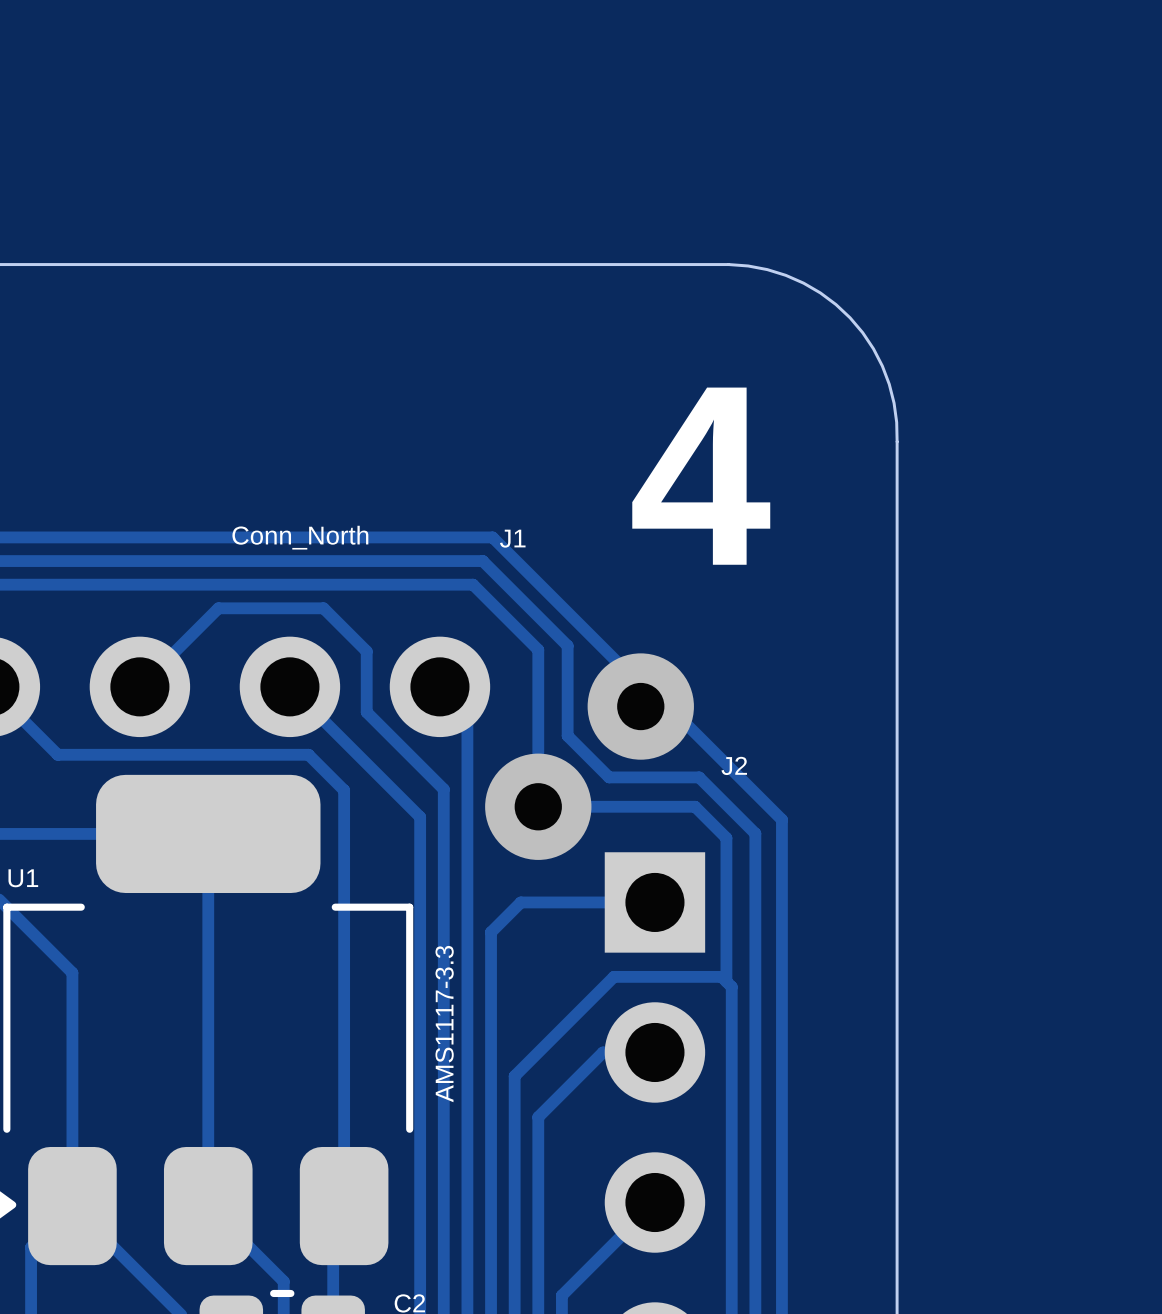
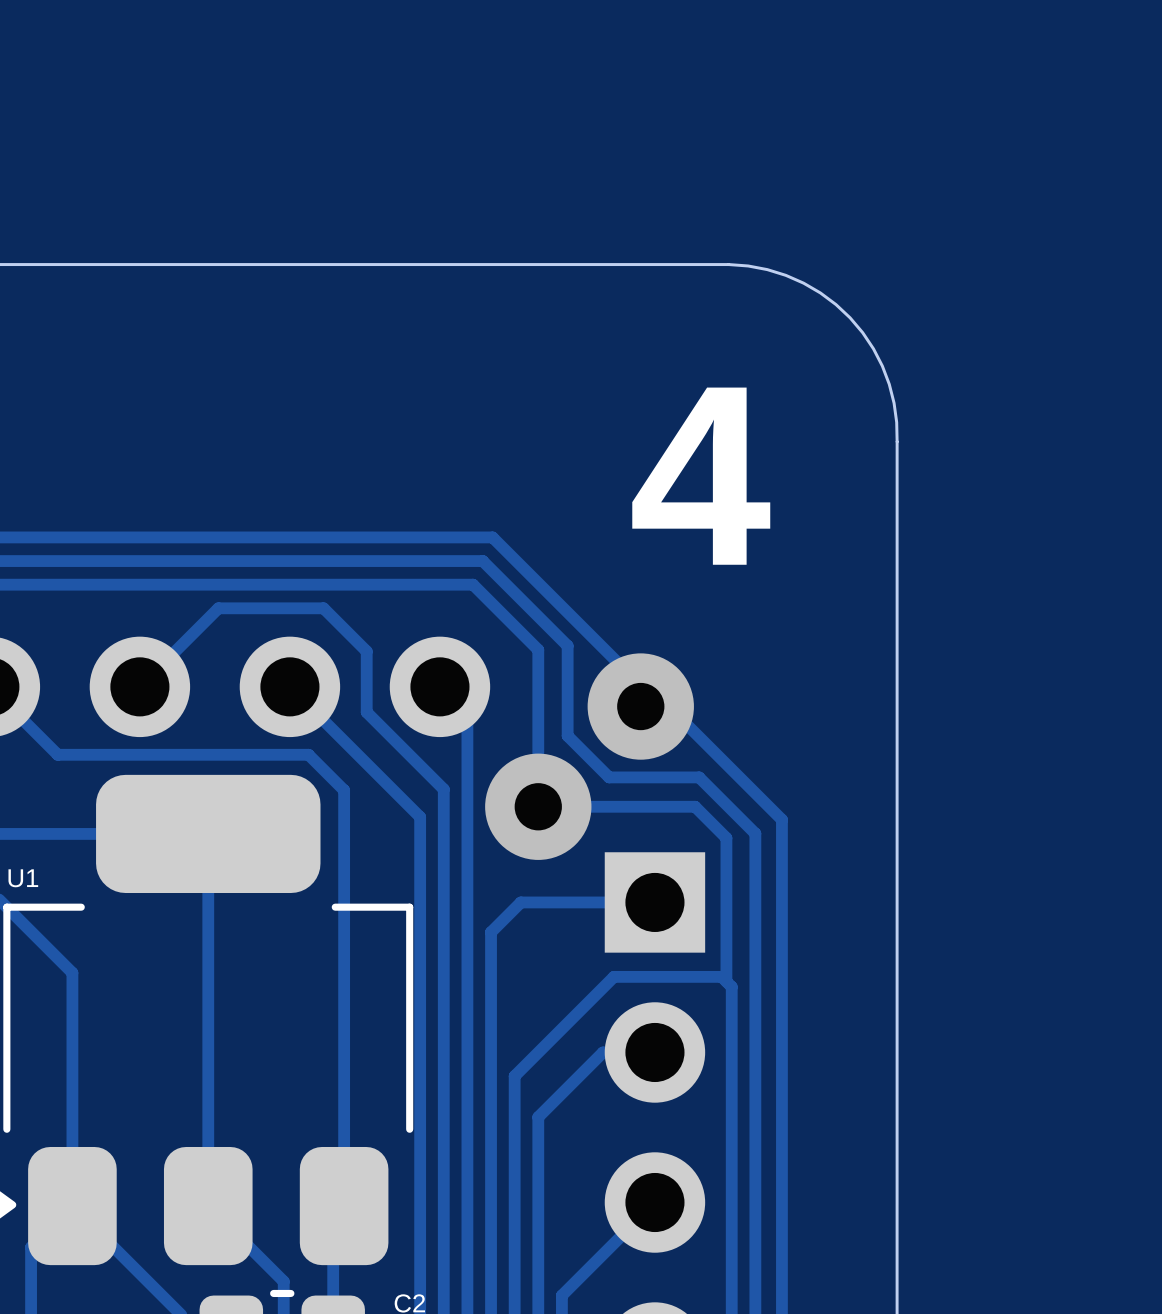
J1 value: Conn_North (300, 537) -> none
J1 name: J1 (512, 538) -> none
J2 name: J2 (734, 765) -> none
U1 value: AMS1117-3.3 (444, 1024) -> none

